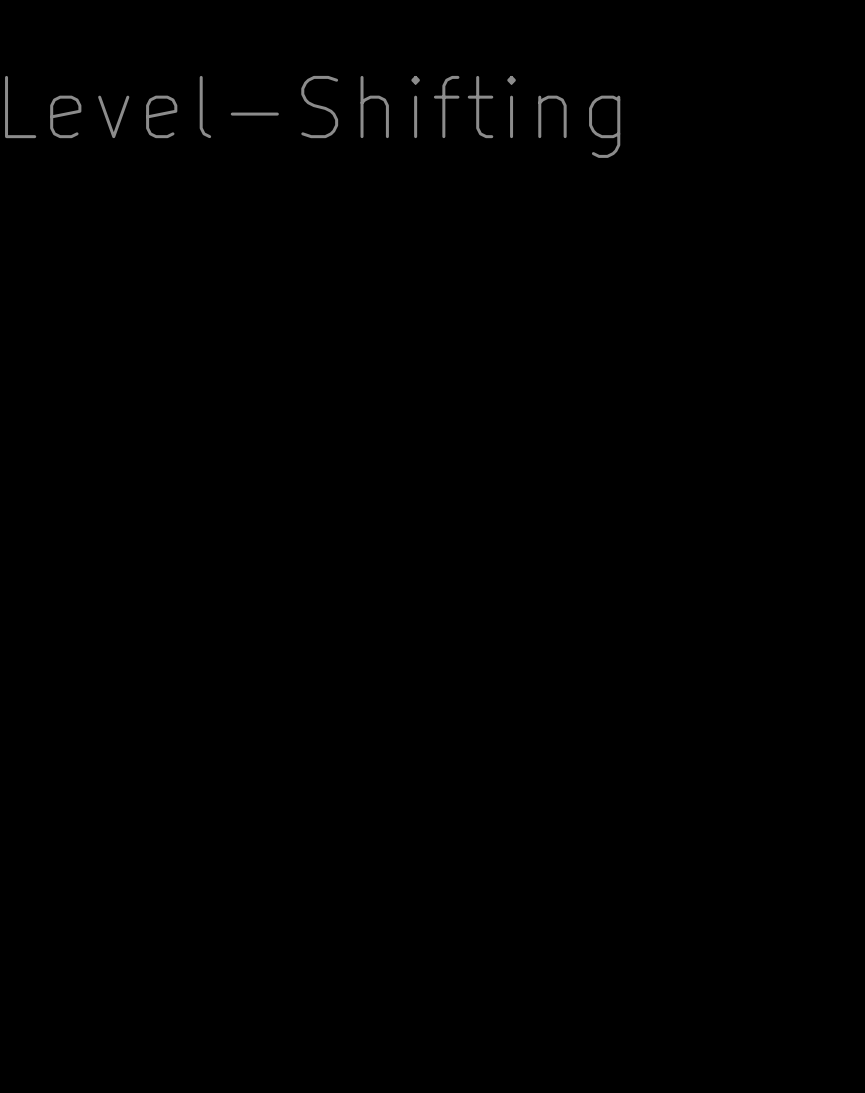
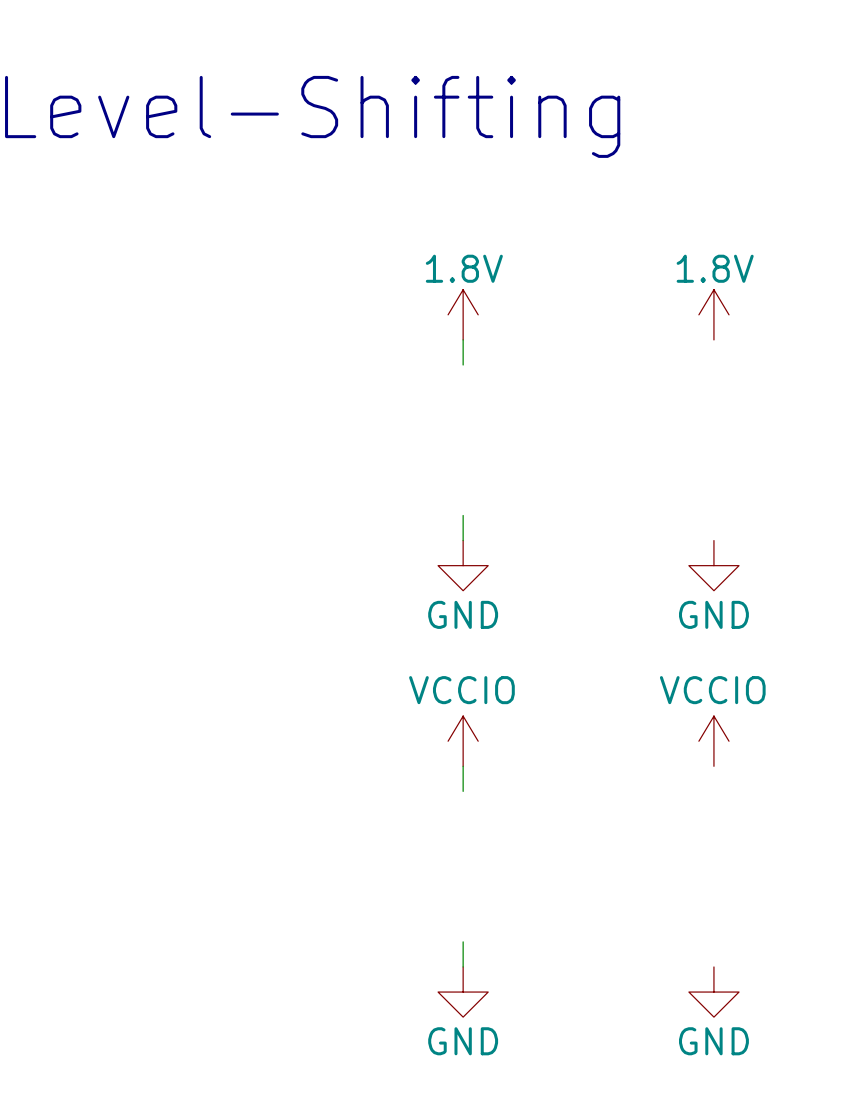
power symbol: none -> 1.8V (463, 314)
power symbol: none -> 1.8V (713, 314)
wire: none -> (463, 339) (463, 364)
wire: none -> (463, 515) (463, 540)
power symbol: none -> GND (463, 565)
power symbol: none -> GND (713, 565)
power symbol: none -> VCCIO (463, 741)
power symbol: none -> VCCIO (713, 741)
wire: none -> (463, 766) (463, 791)
wire: none -> (463, 941) (463, 966)
power symbol: none -> GND (463, 992)
power symbol: none -> GND (713, 992)

